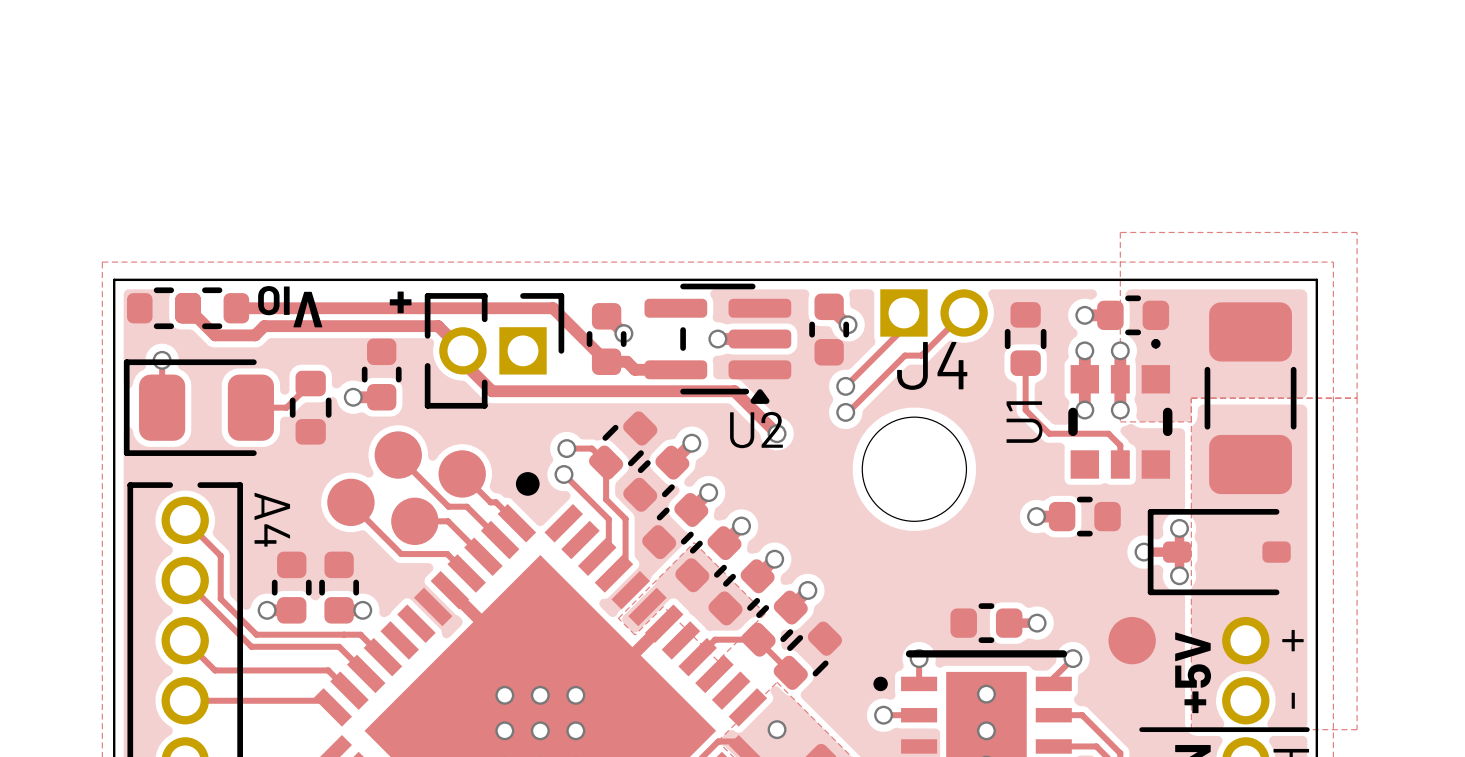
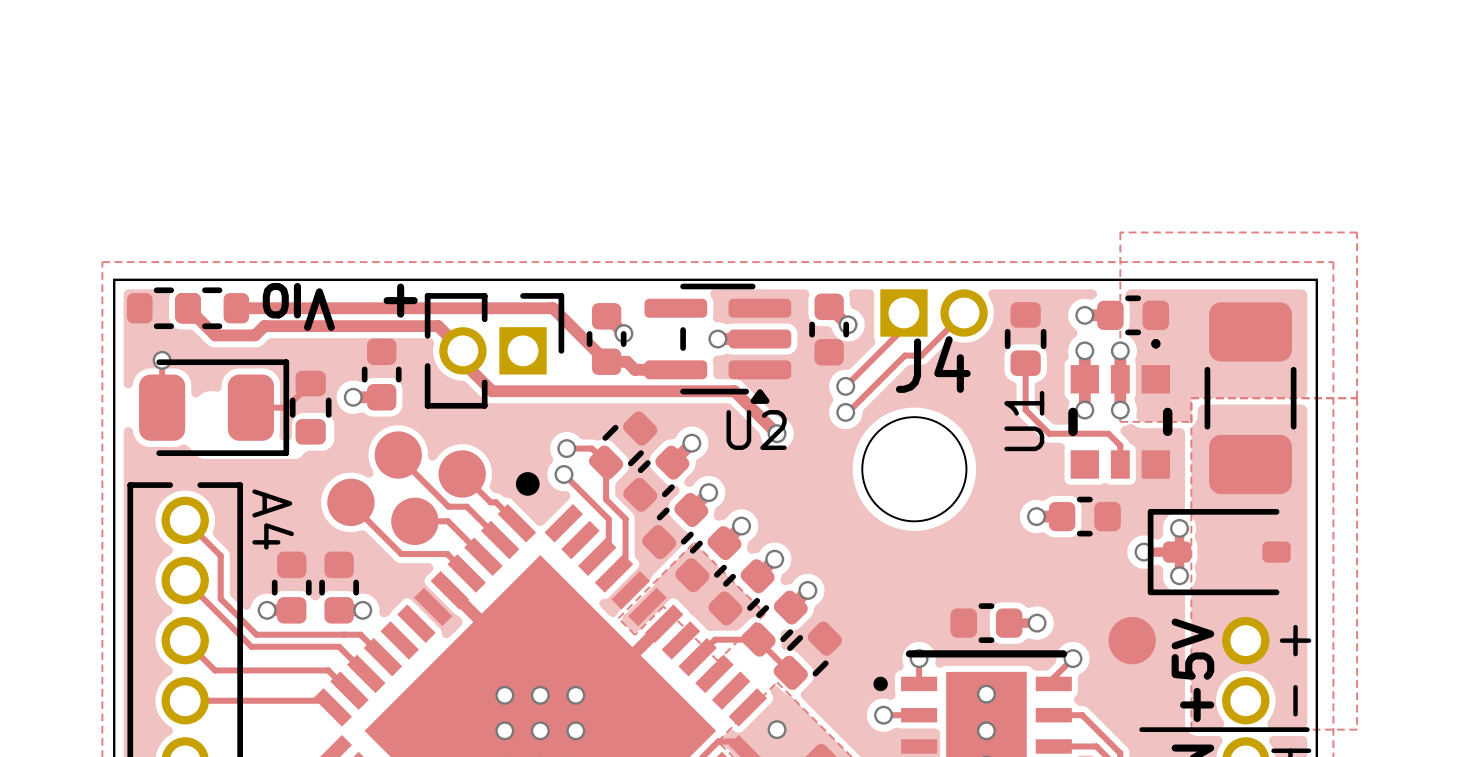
part rotation: 0° (198, 407) -> 180° (214, 407)

